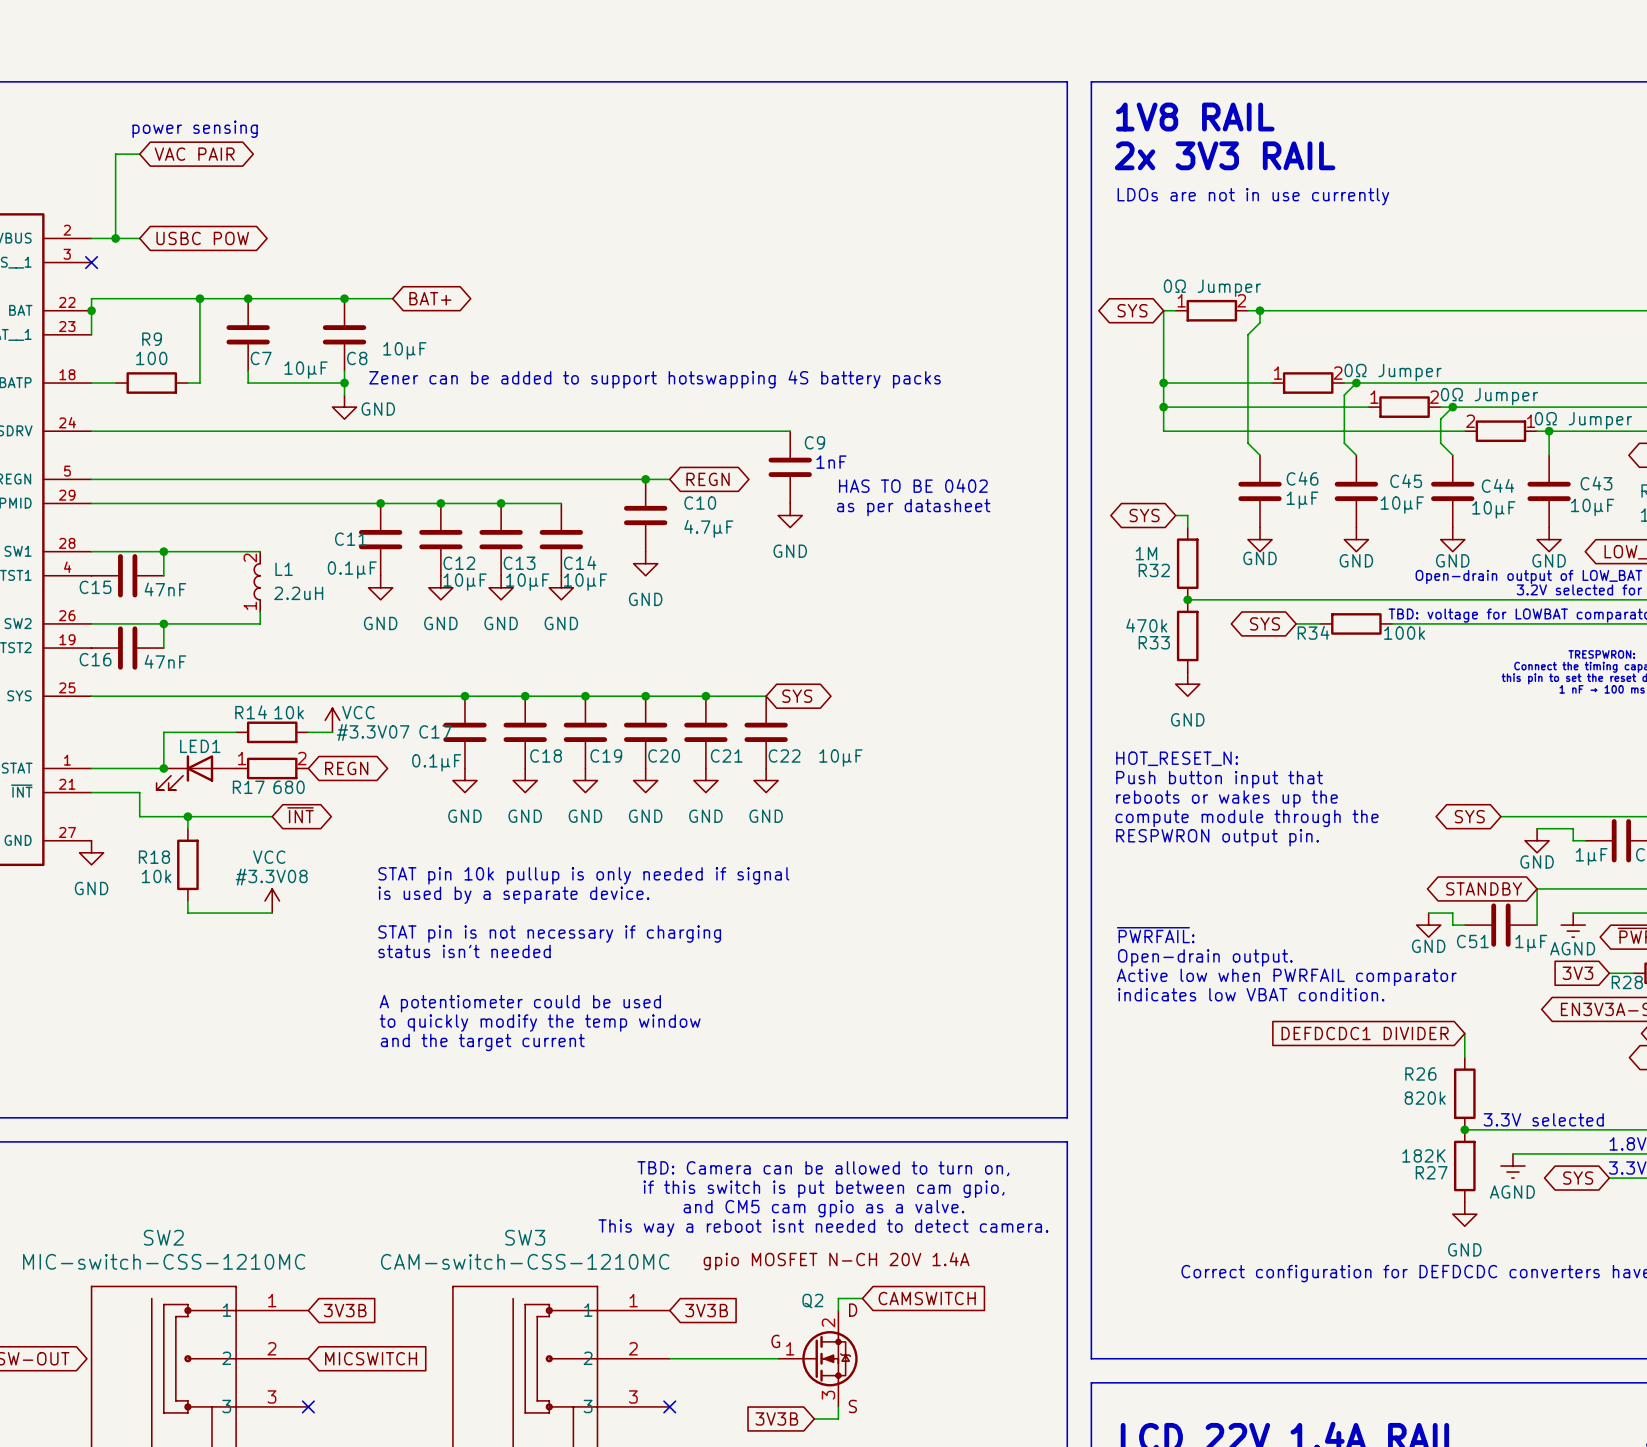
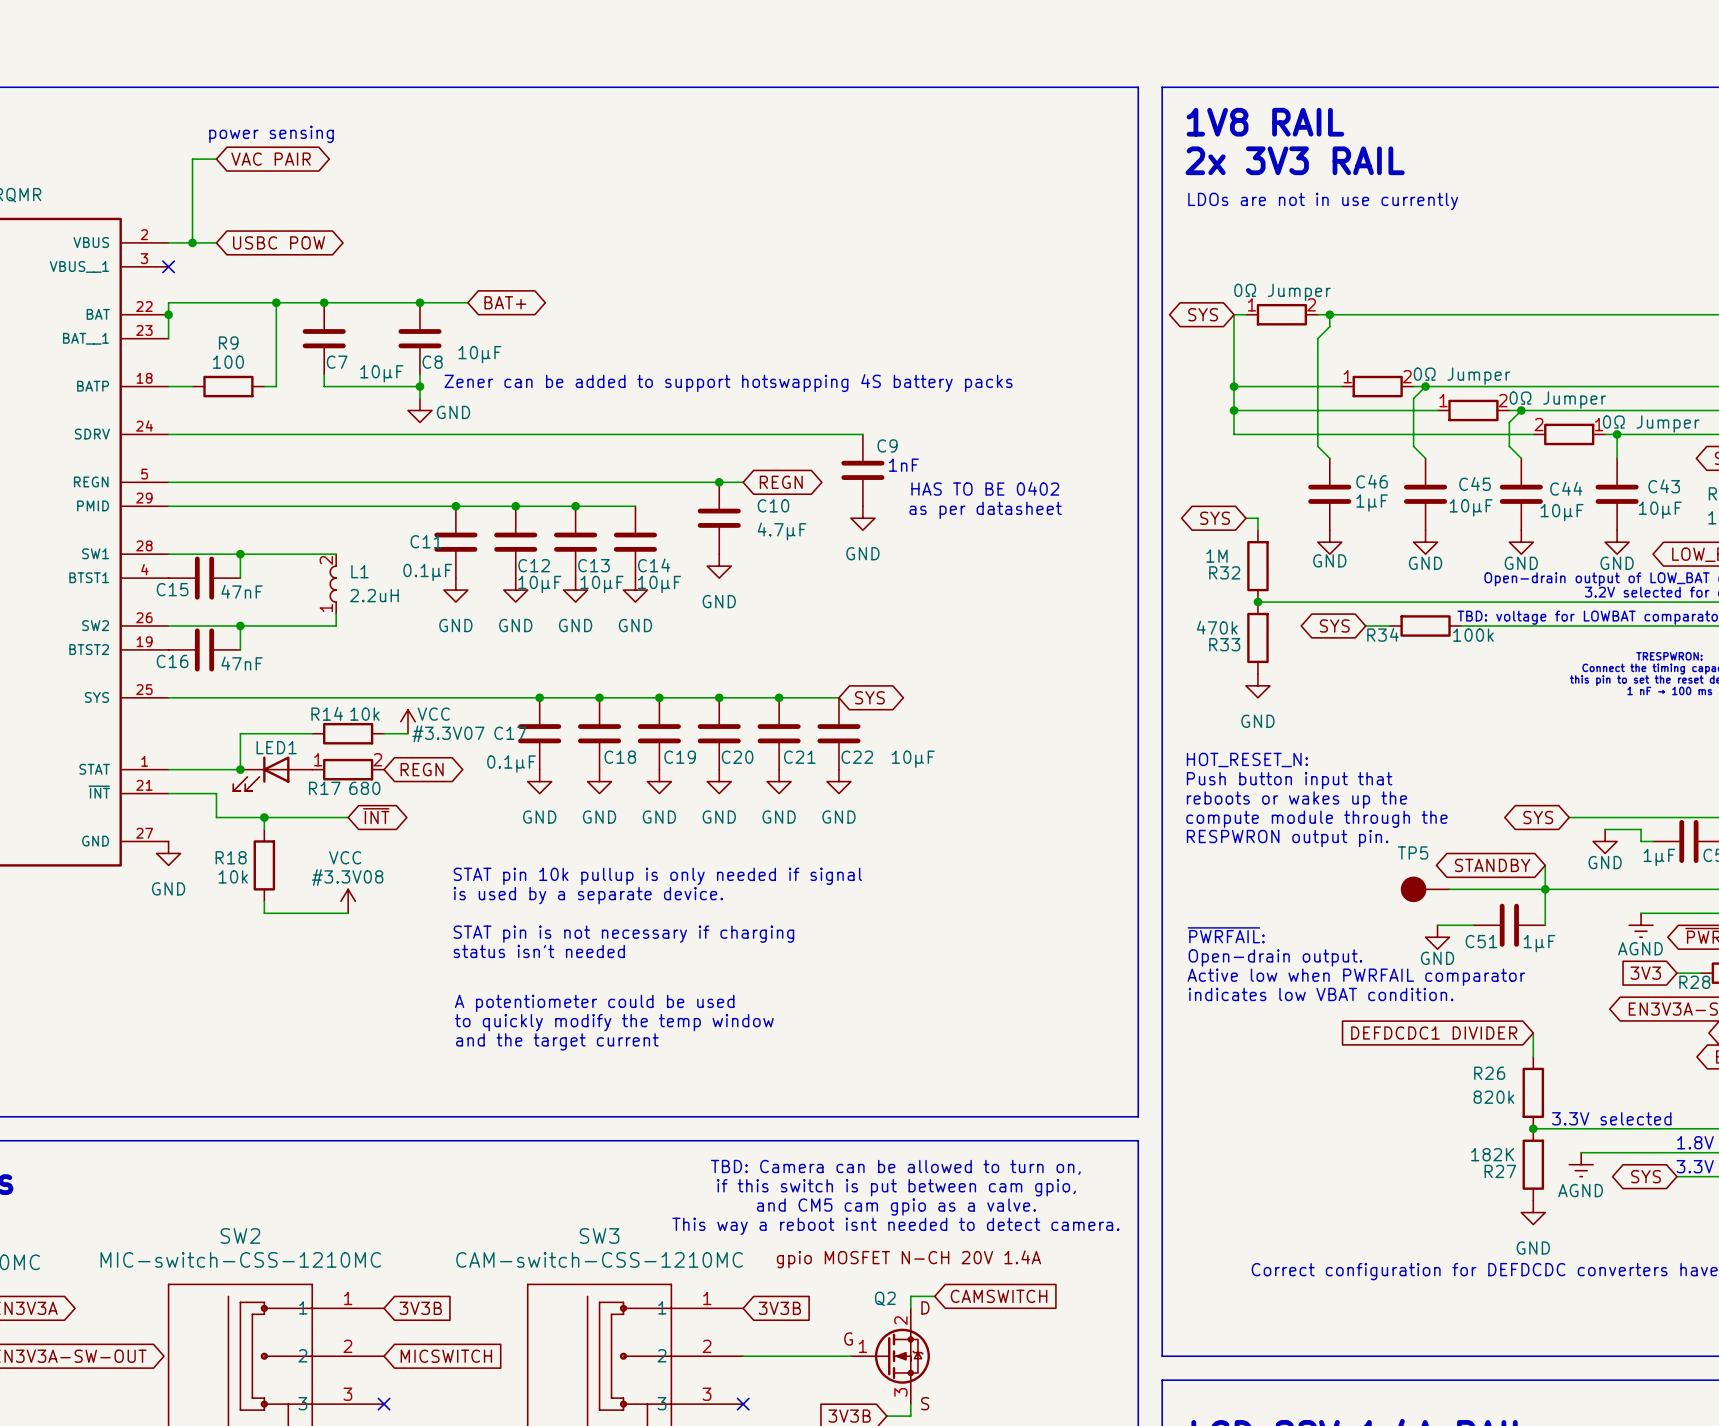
wire: none -> (1545, 865) (1545, 925)
TP5: none -> (1425, 889)
junction: none -> (1545, 889)
global label position: STANDBY (1484, 888) -> STANDBY (1492, 865)
wire: (1537, 888) (1537, 925) -> (1605, 889) (1449, 889)
wire: (1428, 913) (1452, 913) (1452, 925) (1464, 925) -> none
wire: none -> (1437, 925) (1473, 925)
power symbol position: GND (1428, 925) -> GND (1437, 937)
C51 position: (1500, 925) -> (1509, 925)

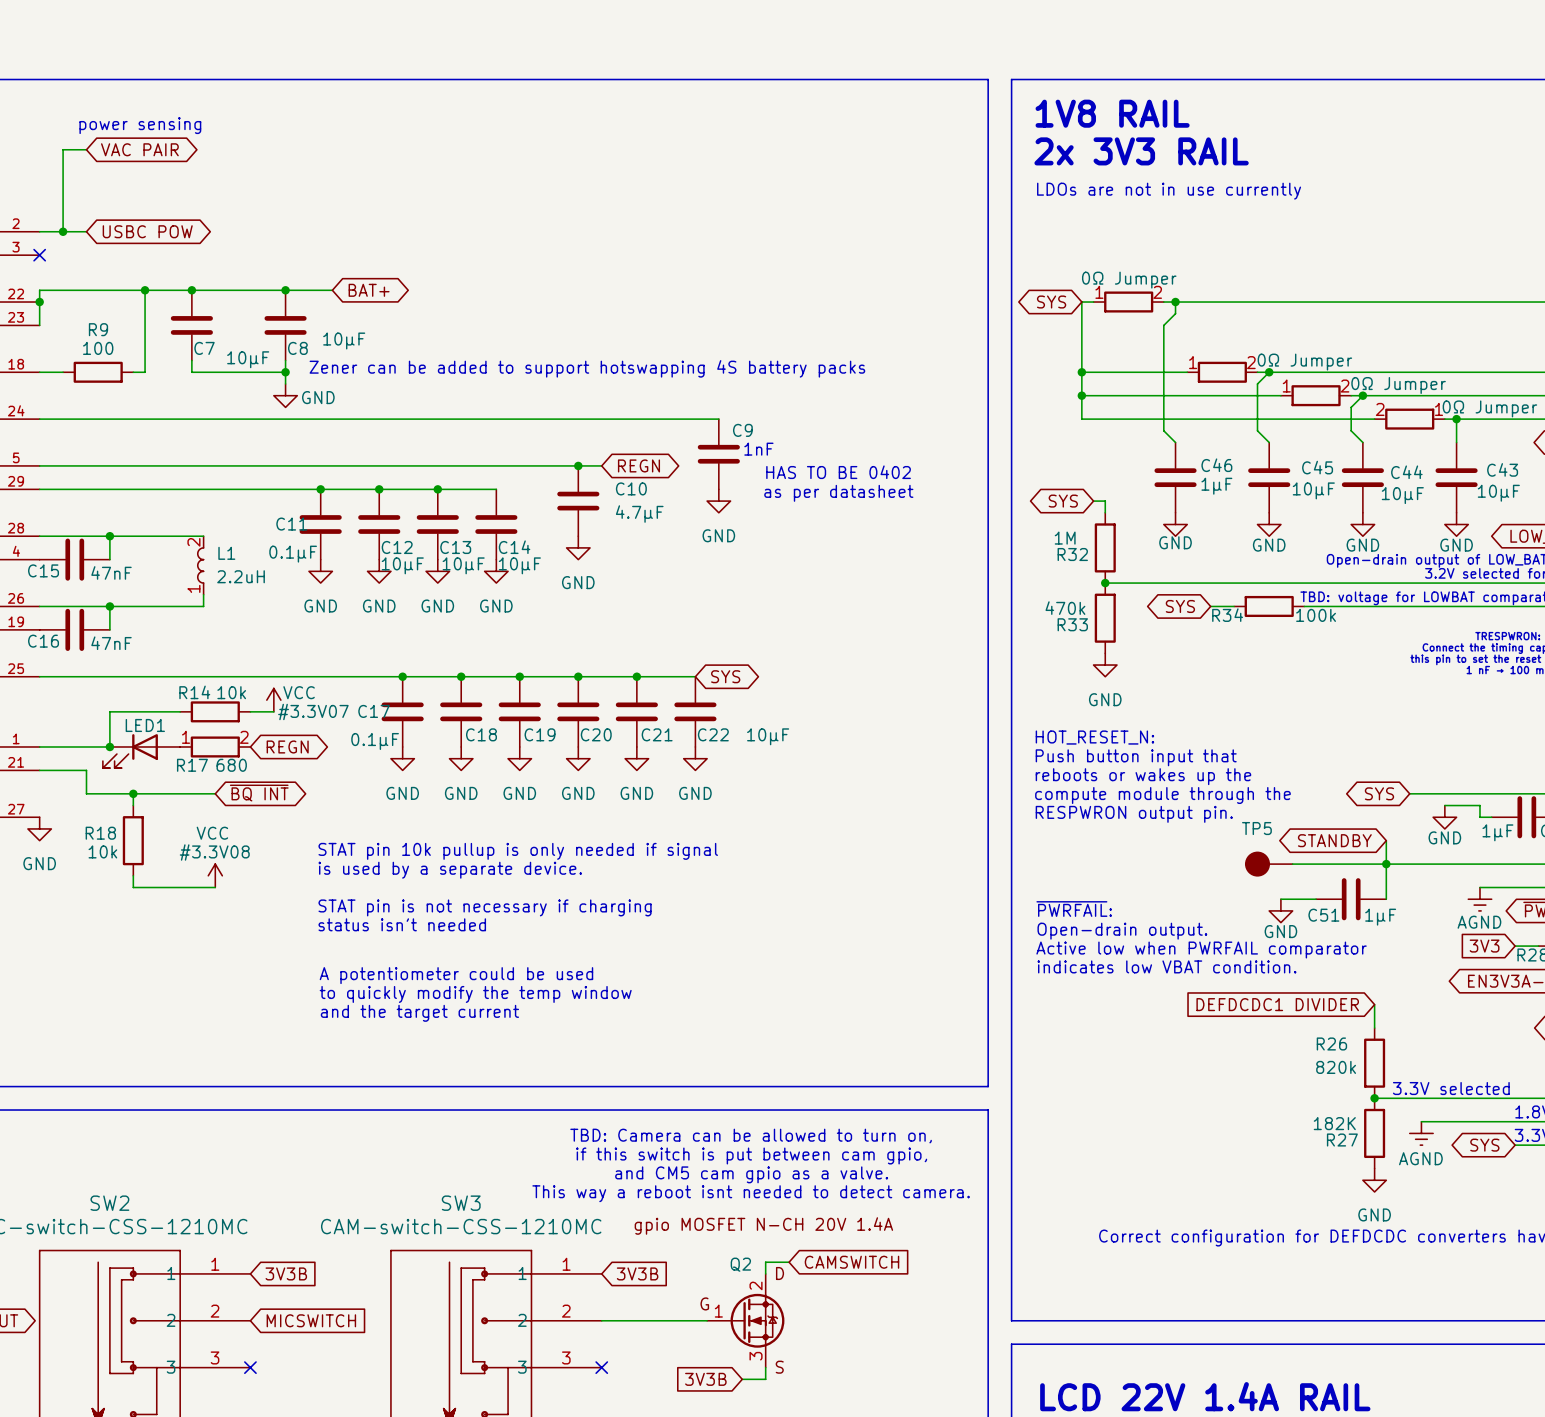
global label: ~{INT} (376, 816) -> ~{BQ INT} (259, 793)

